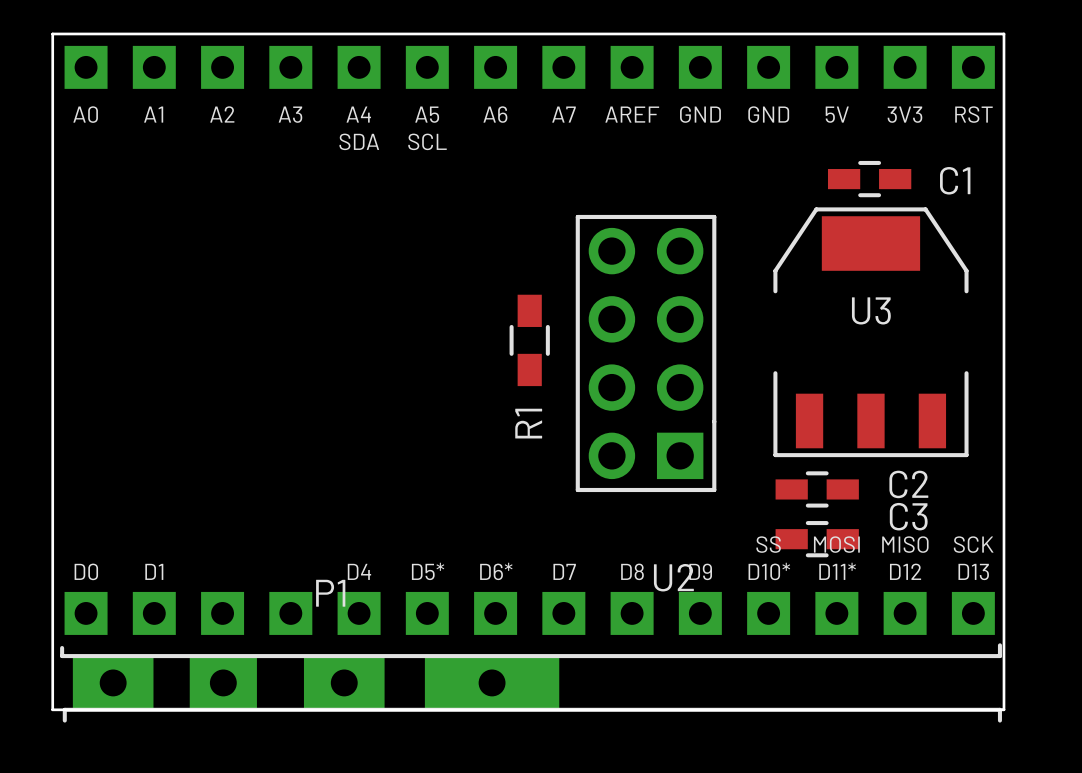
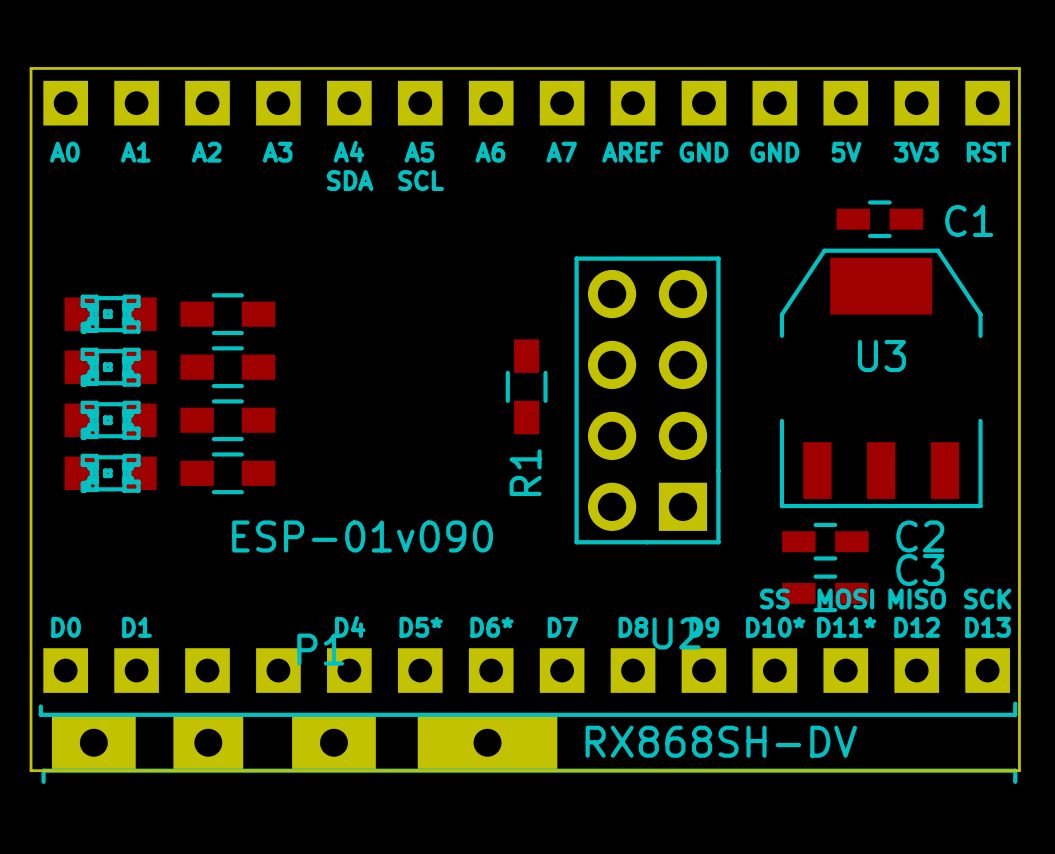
part: none -> (110, 314)
part: none -> (227, 314)
part: none -> (110, 367)
part: none -> (227, 367)
part: none -> (110, 420)
part: none -> (227, 420)
part: none -> (110, 473)
part: none -> (227, 473)
U2 value: none -> ESP-01v090 (362, 536)
P1 value: none -> RX868SH-DV (721, 741)

